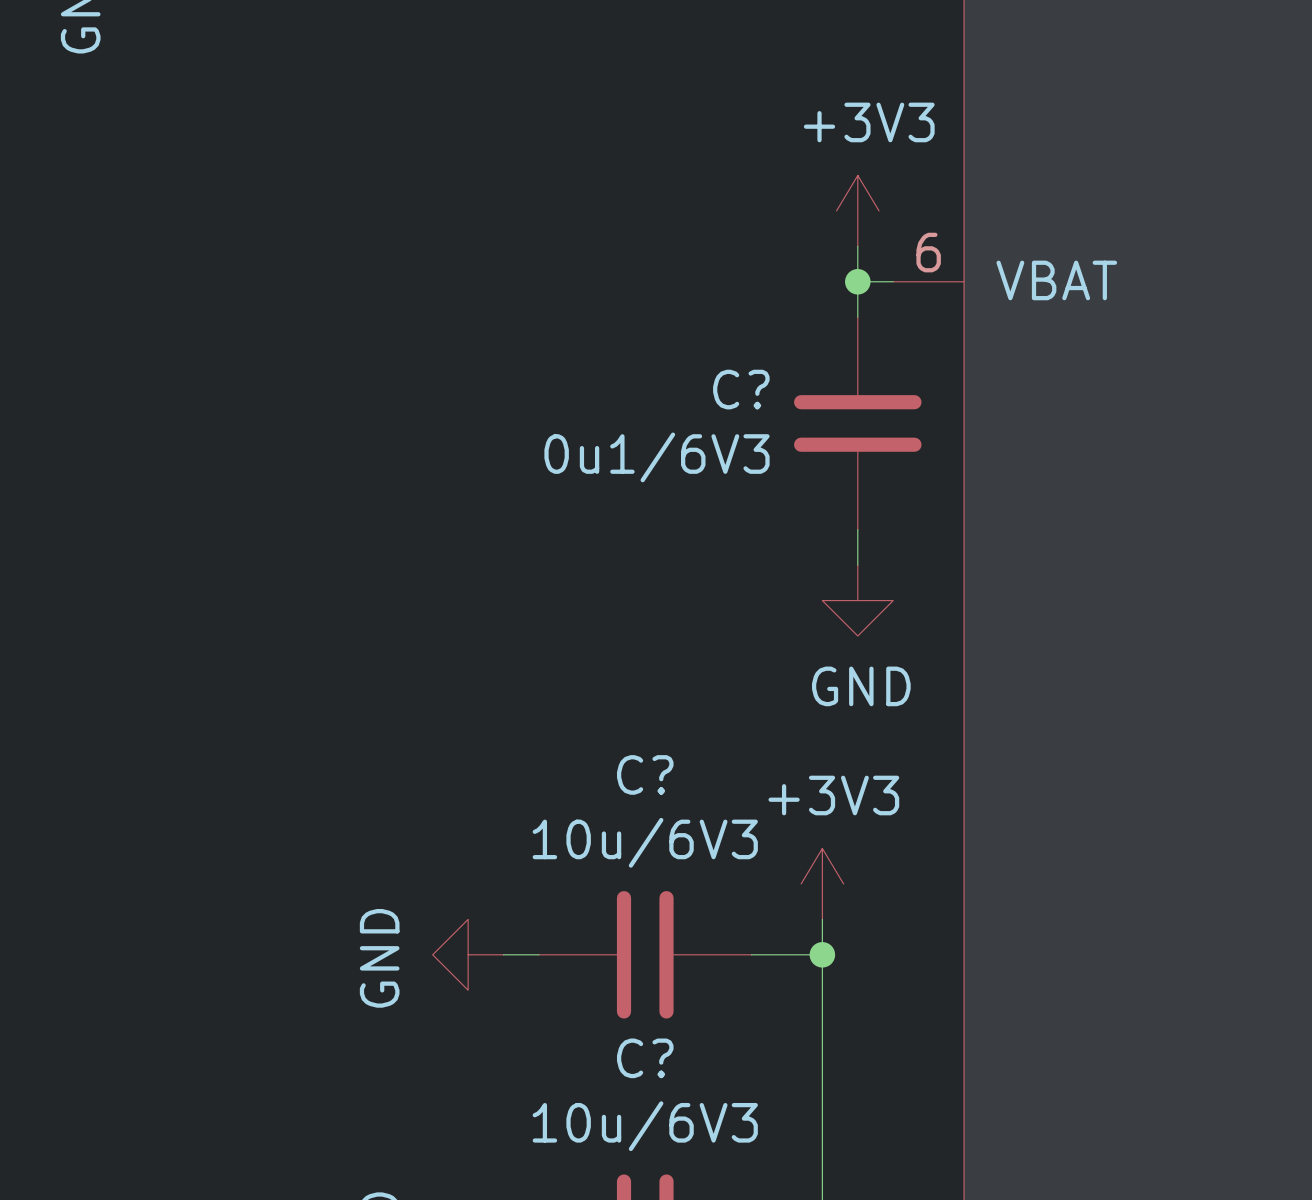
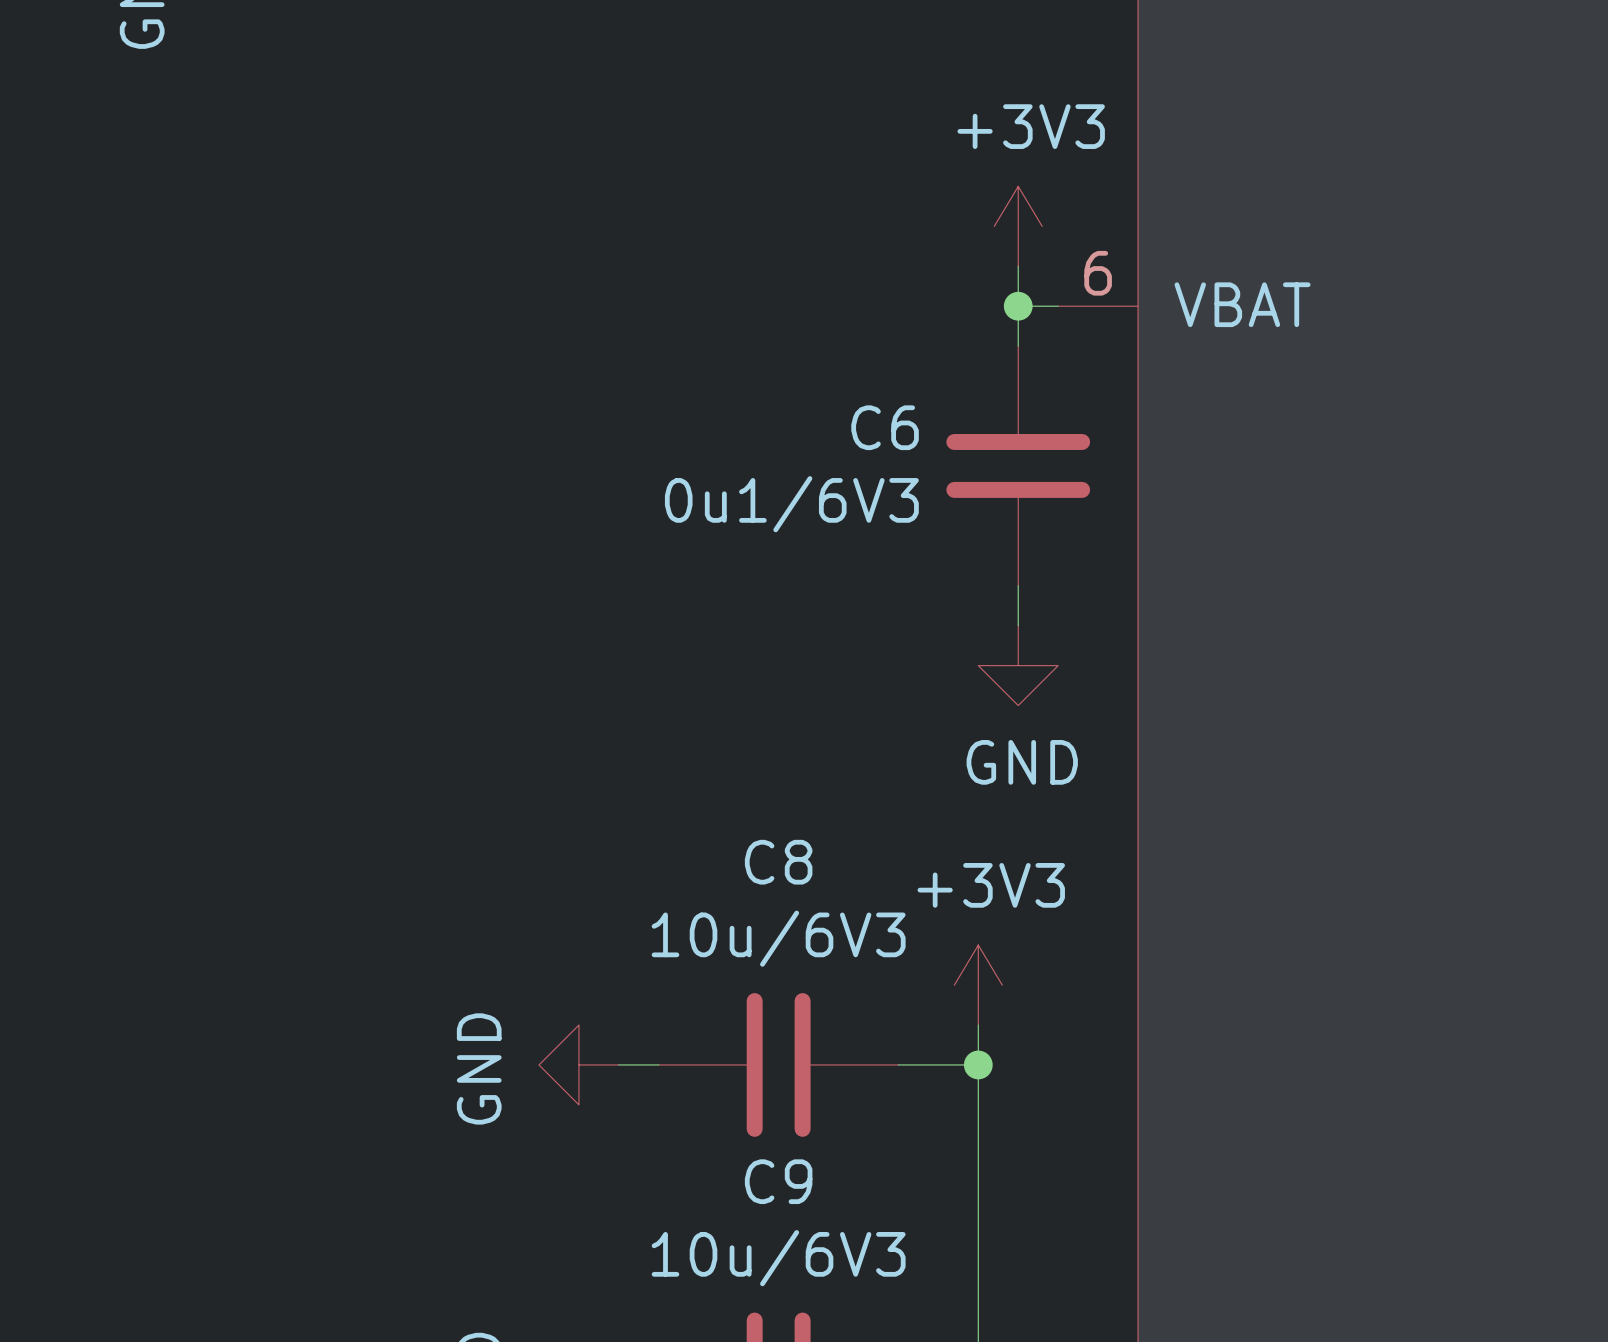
C? name: C? (741, 389) -> C6 (885, 427)
C? name: C? (645, 774) -> C8 (778, 862)
C? name: C? (645, 1058) -> C9 (778, 1181)

